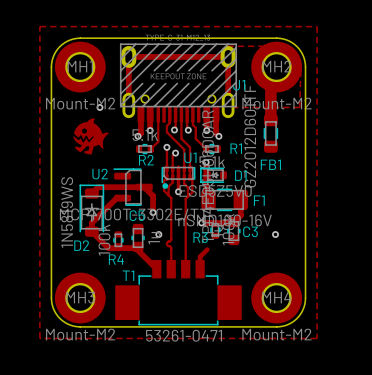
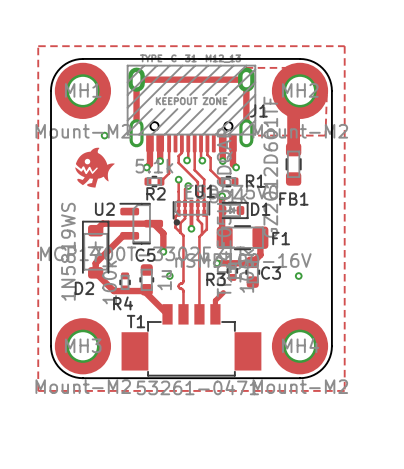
D1 rotation: 0° (213, 175) -> 180° (233, 210)

